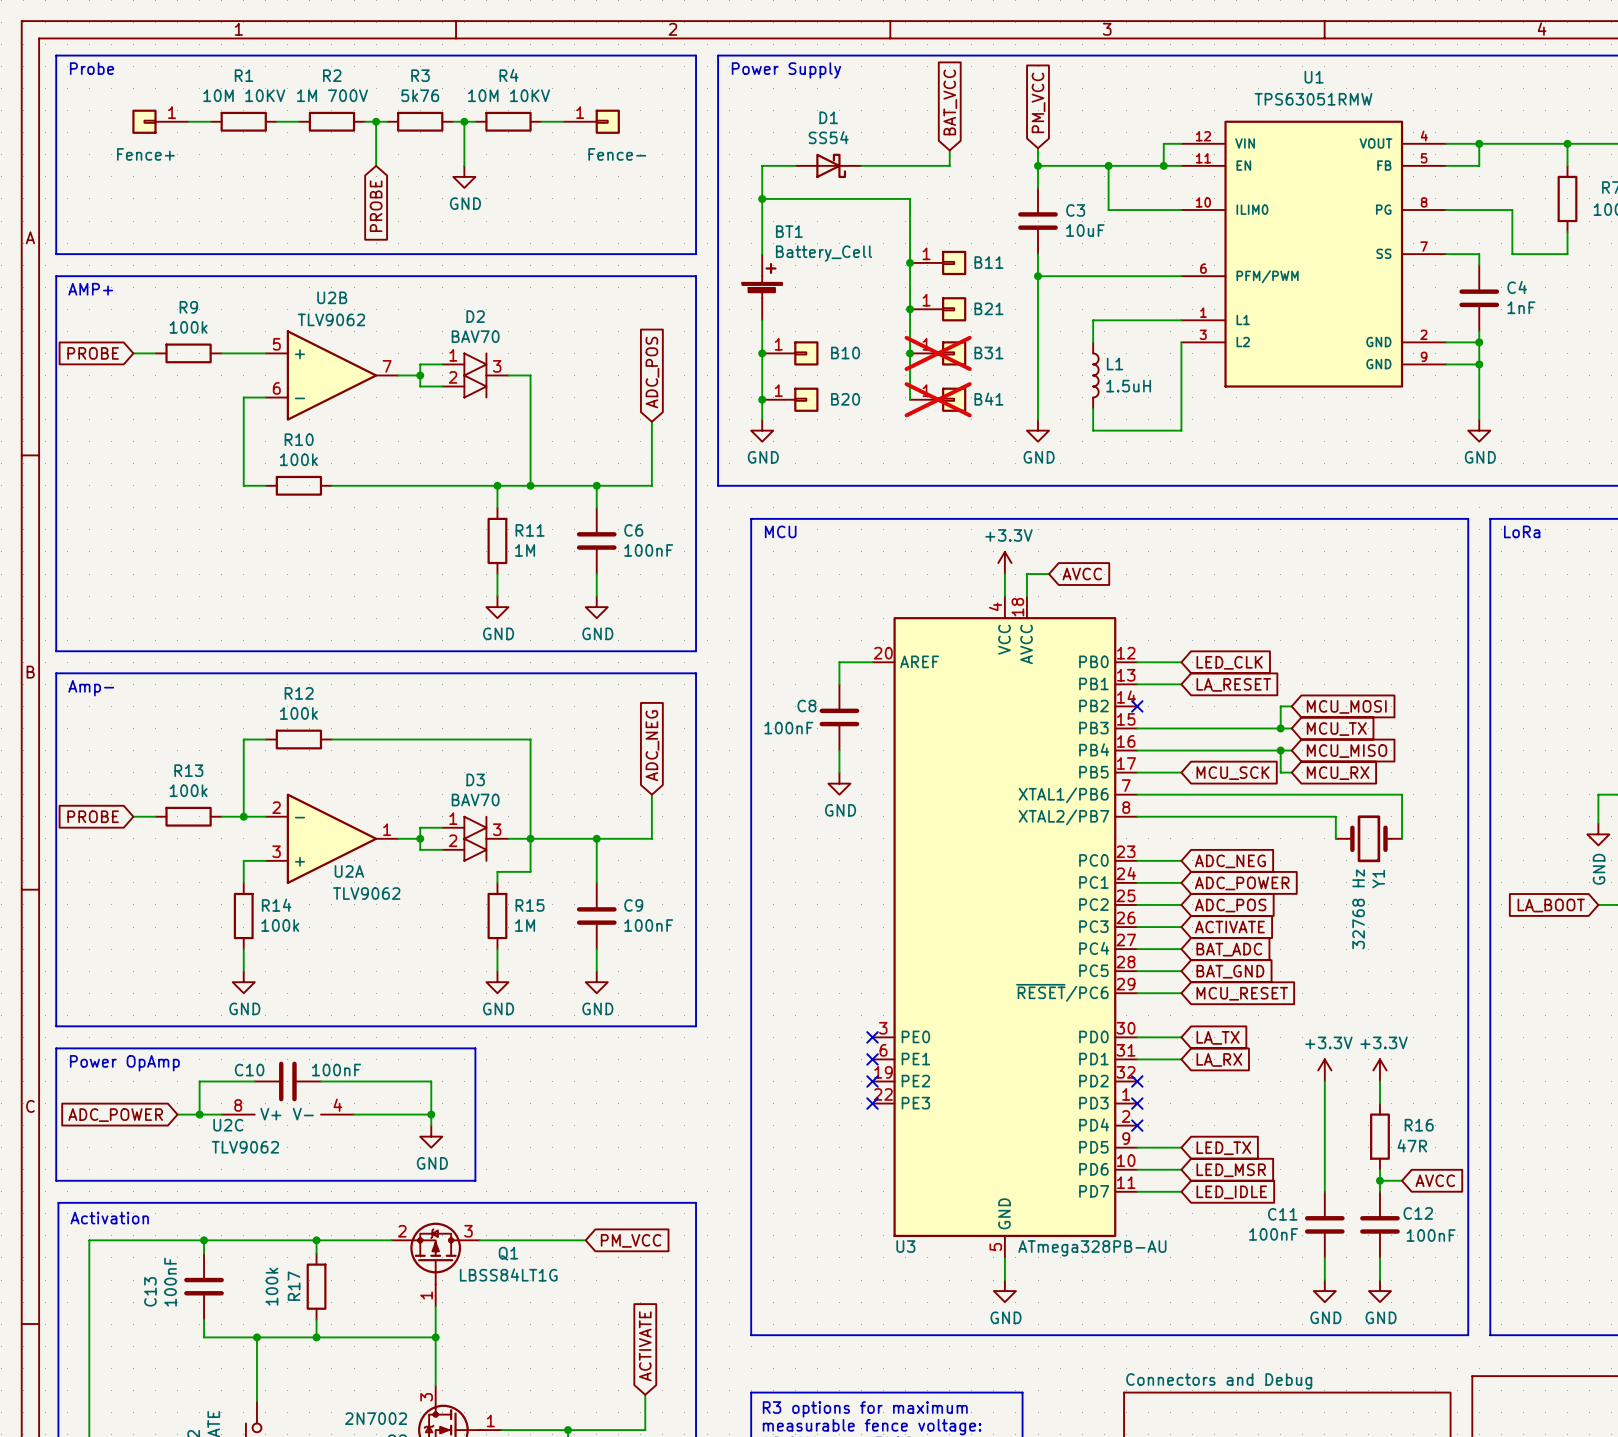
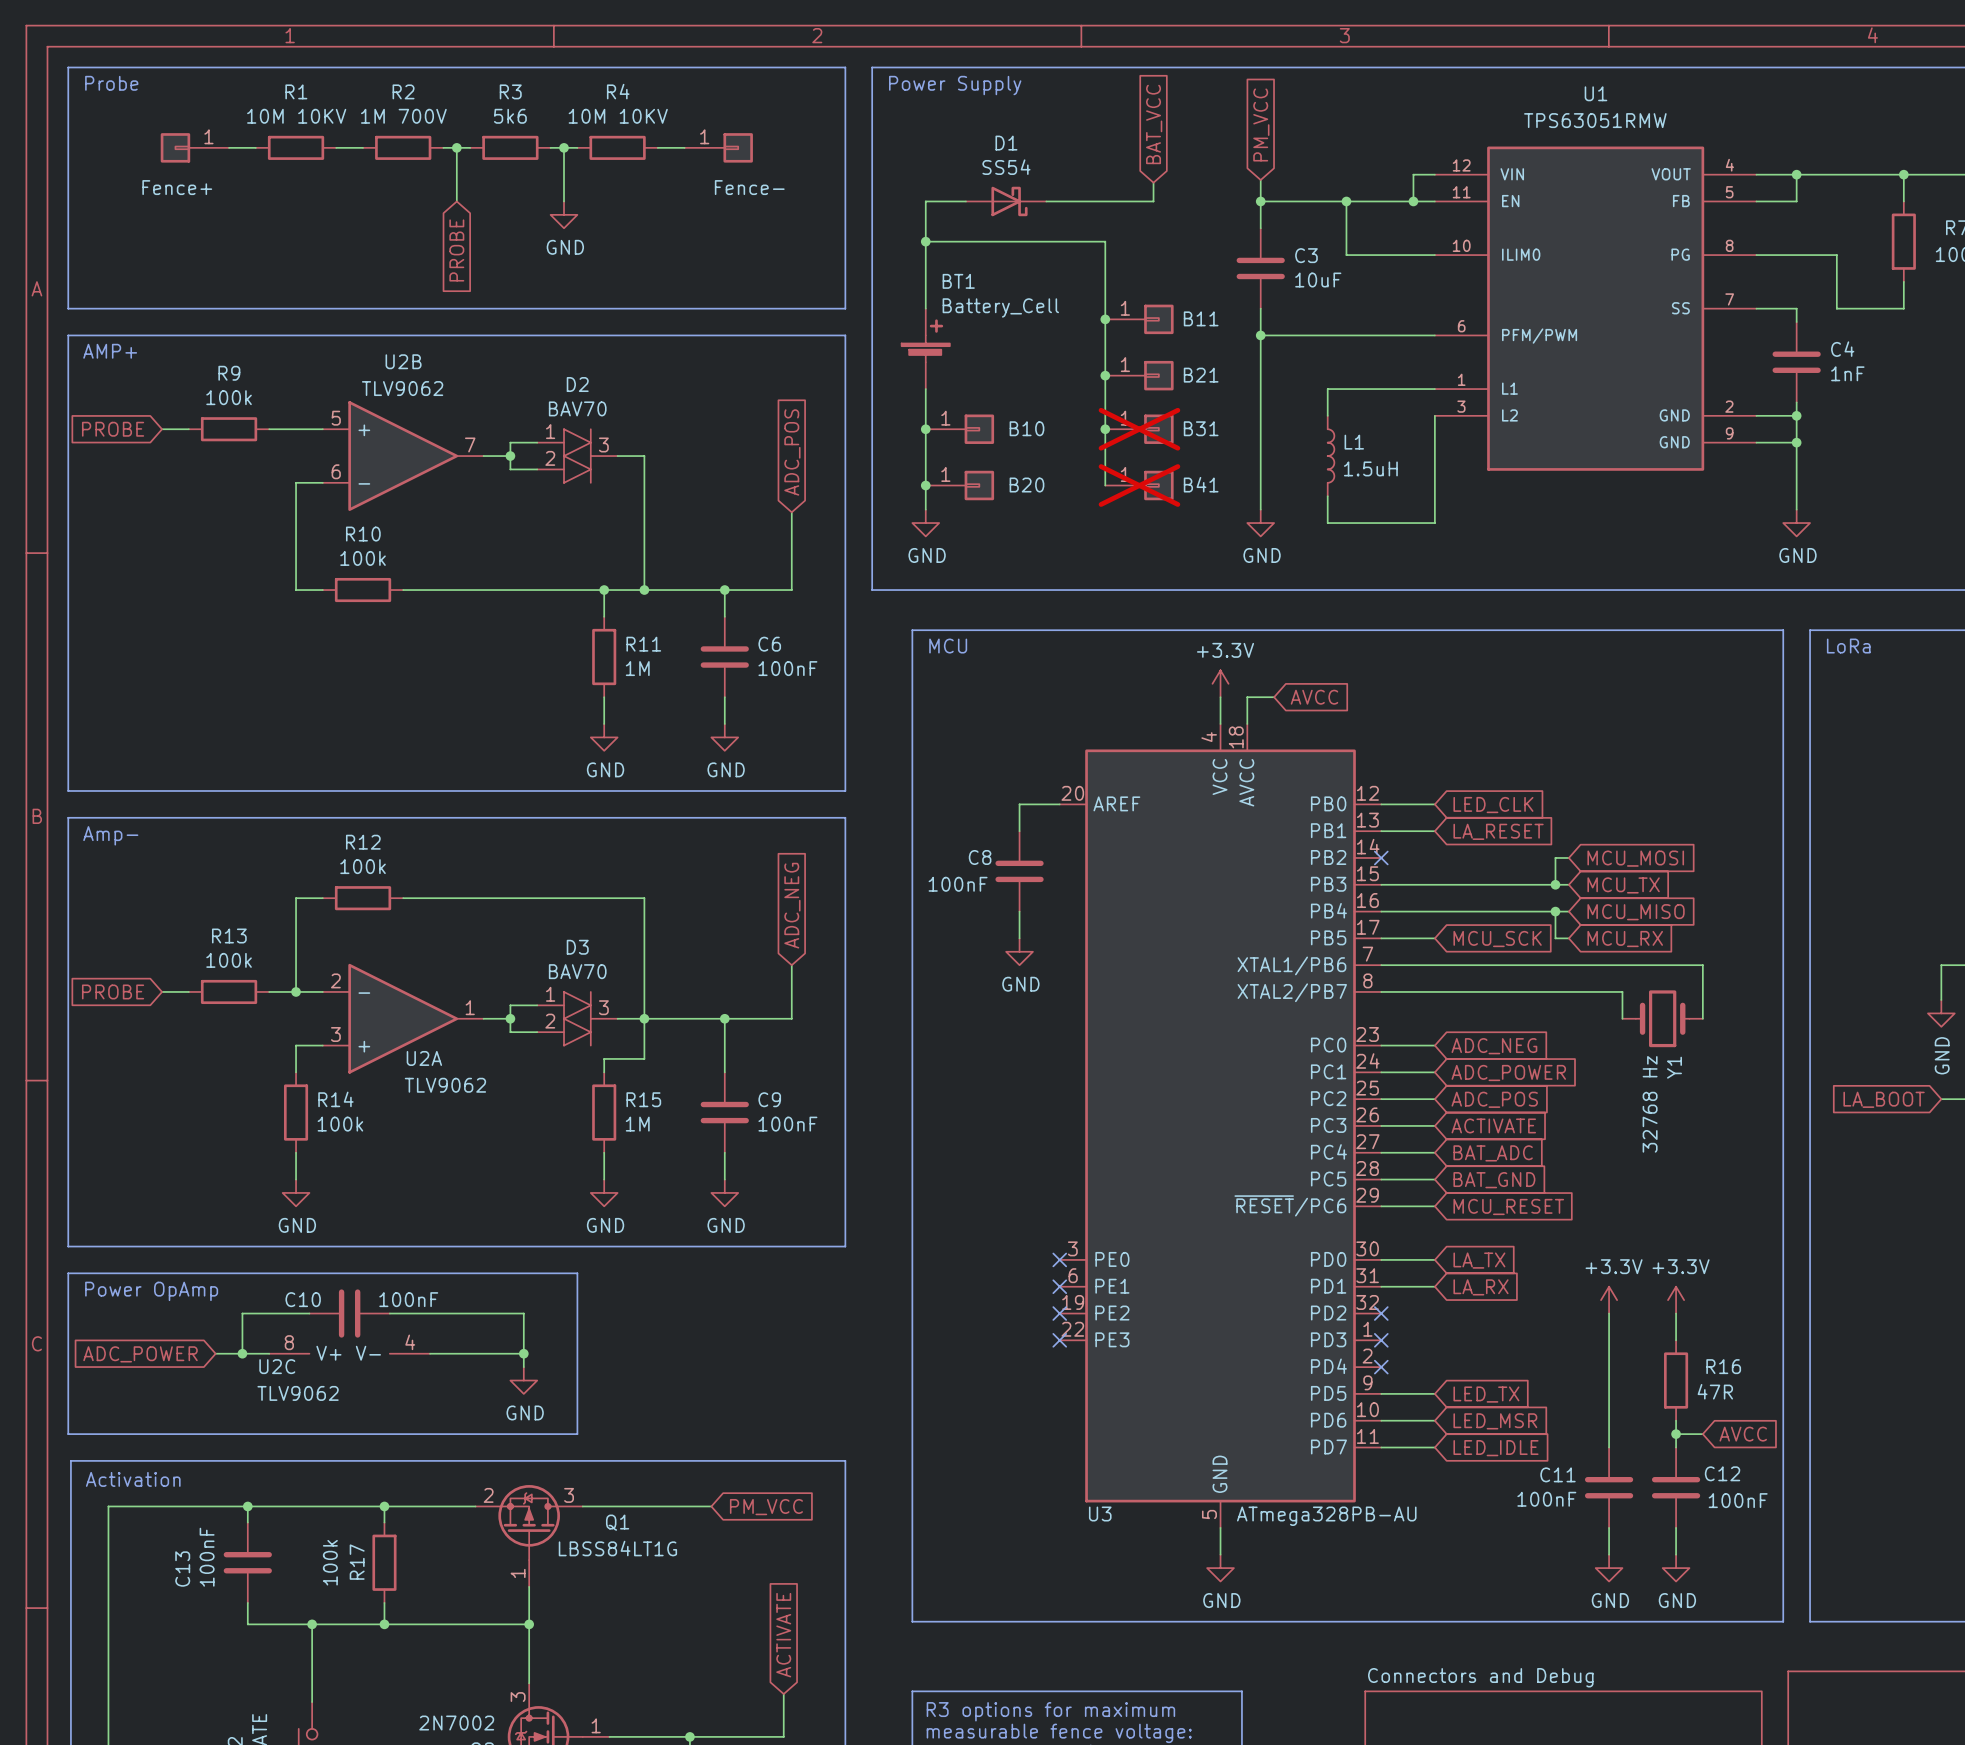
R3 value: 5k76 (420, 95) -> 5k6 (510, 116)

